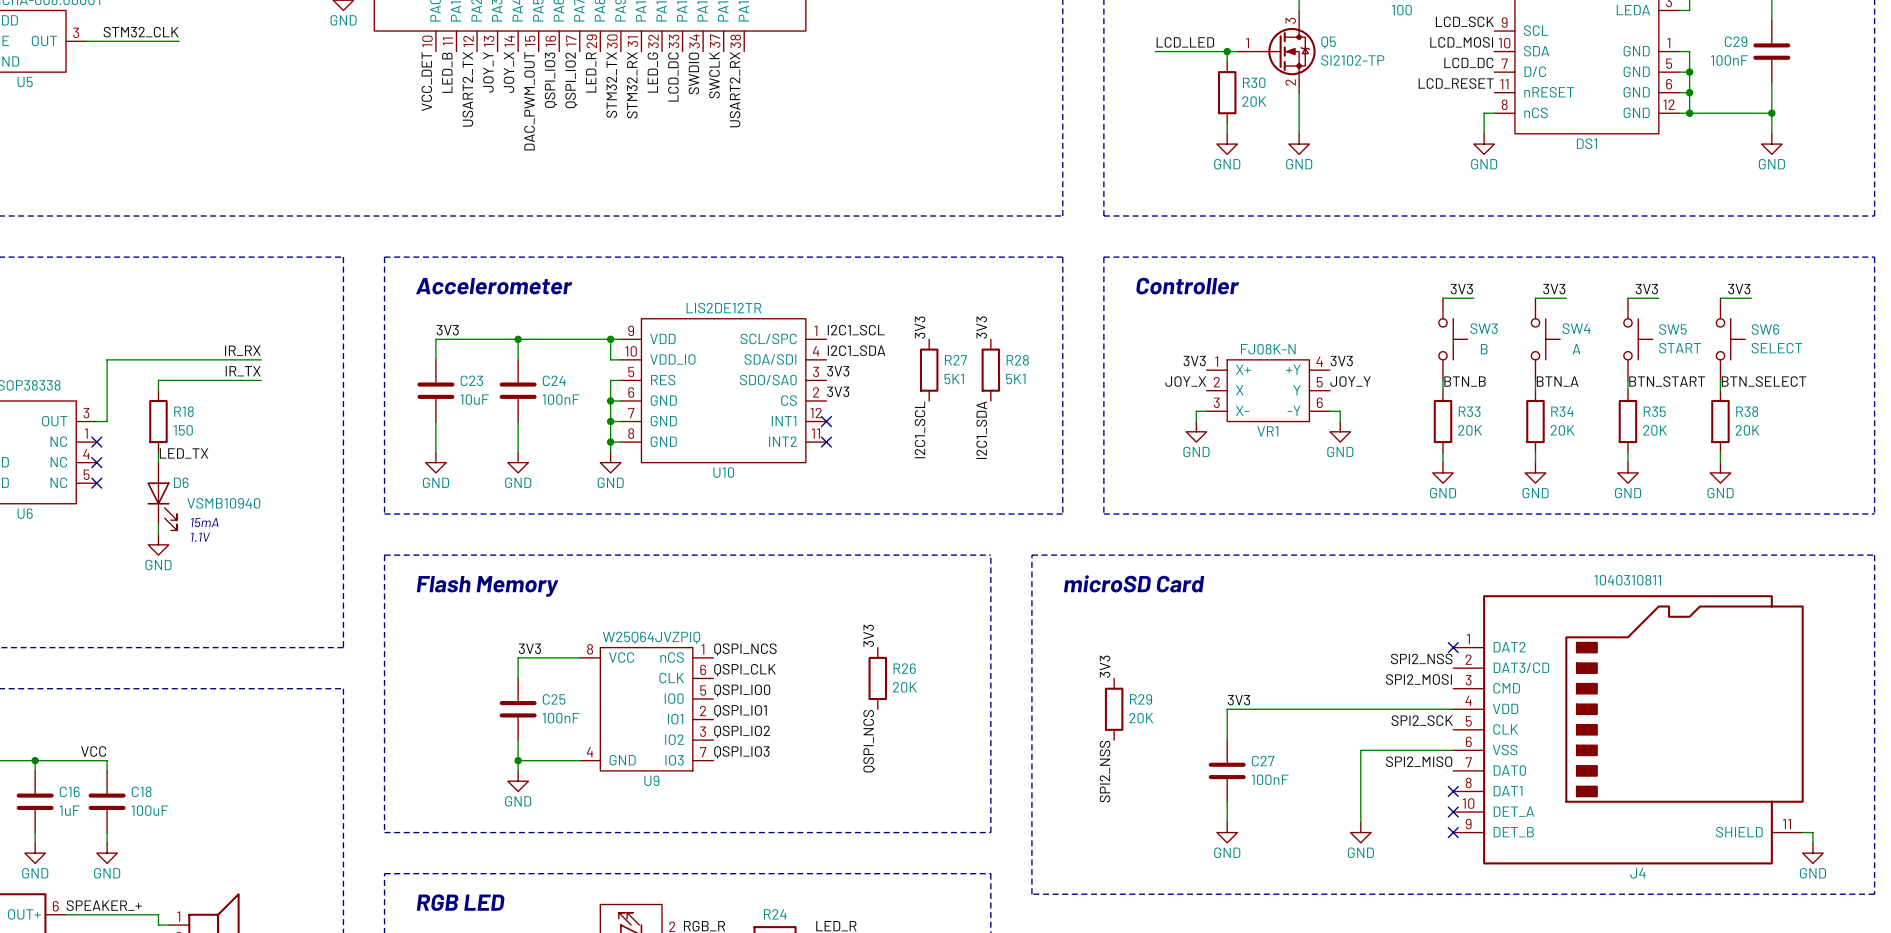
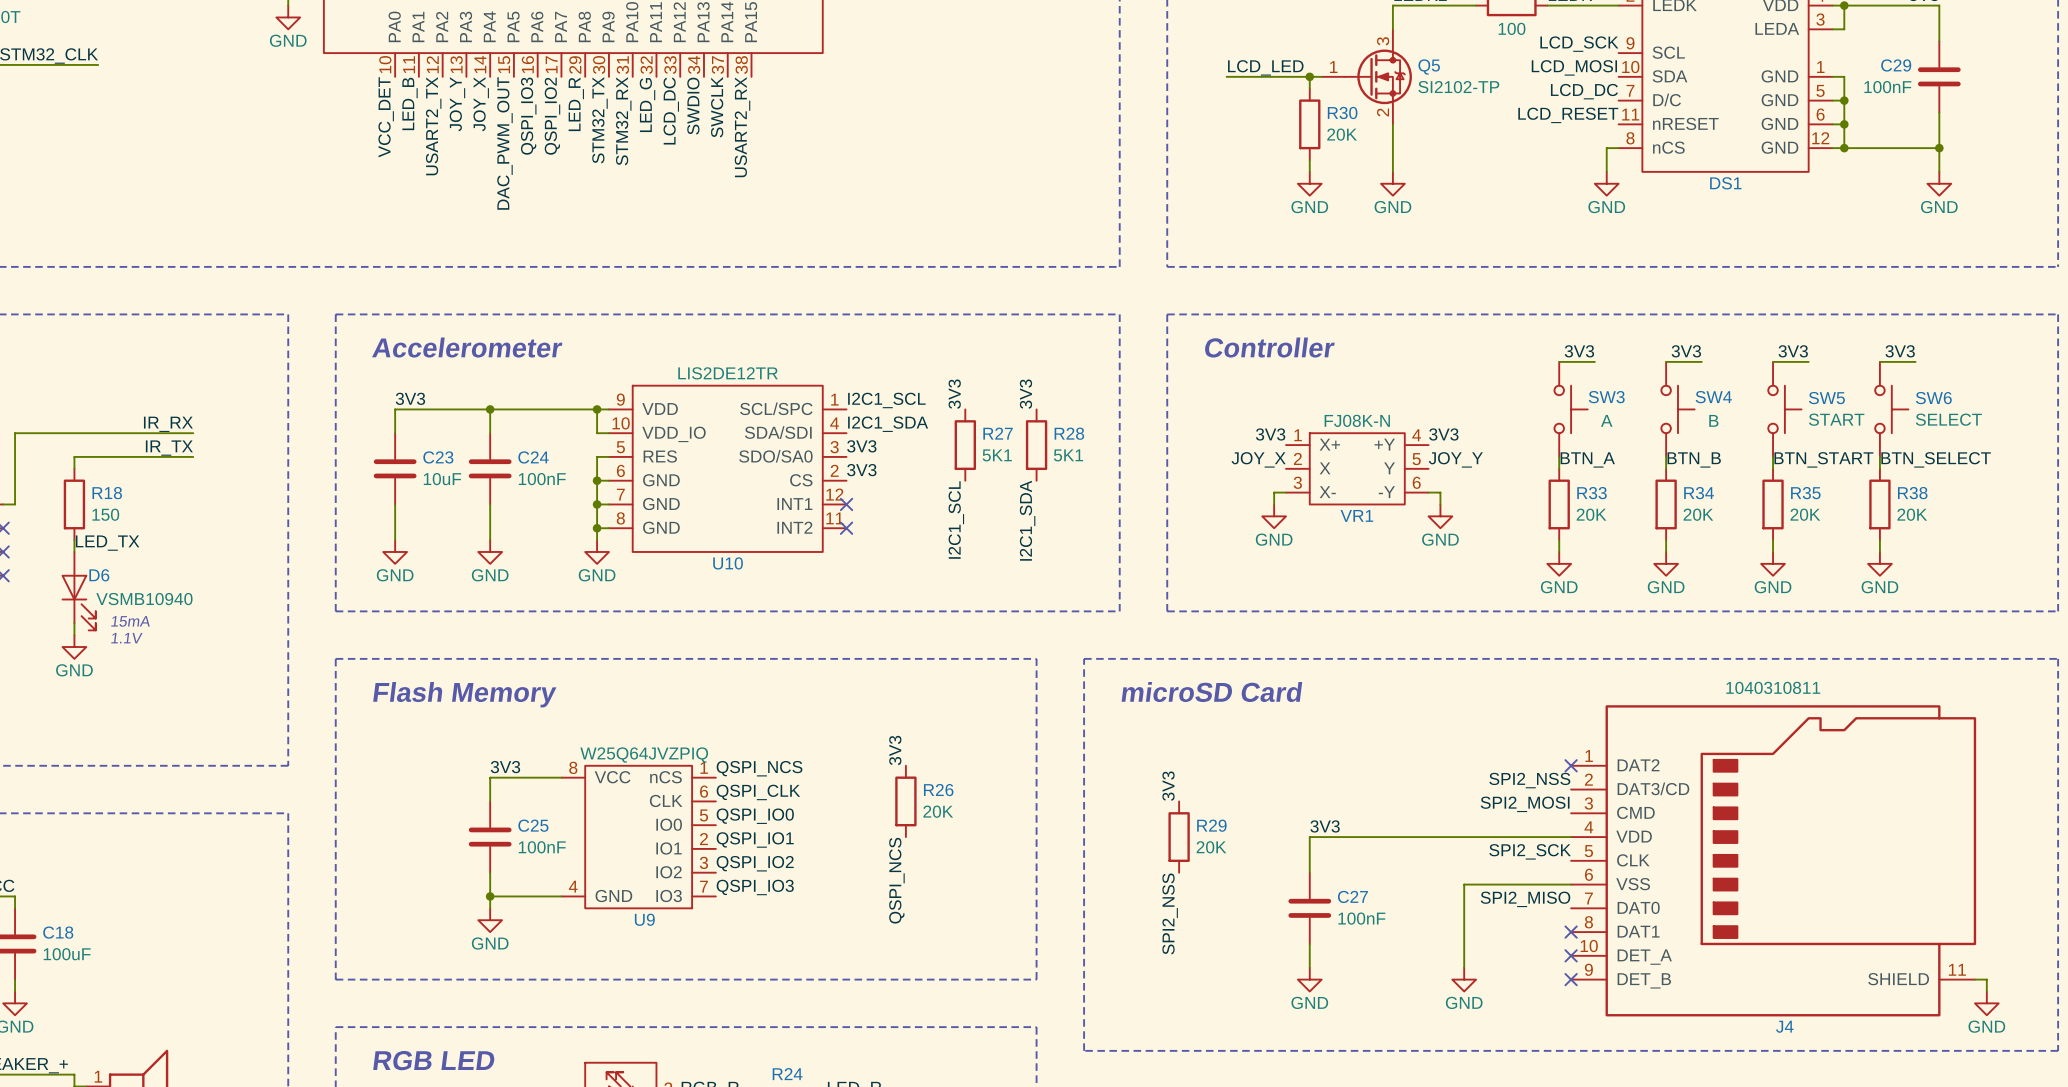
SW3 value: B (1484, 349) -> A (1606, 420)
SW4 value: A (1576, 349) -> B (1713, 420)
label: BTN_B (1465, 381) -> BTN_A (1587, 459)
label: BTN_A (1557, 381) -> BTN_B (1694, 459)

